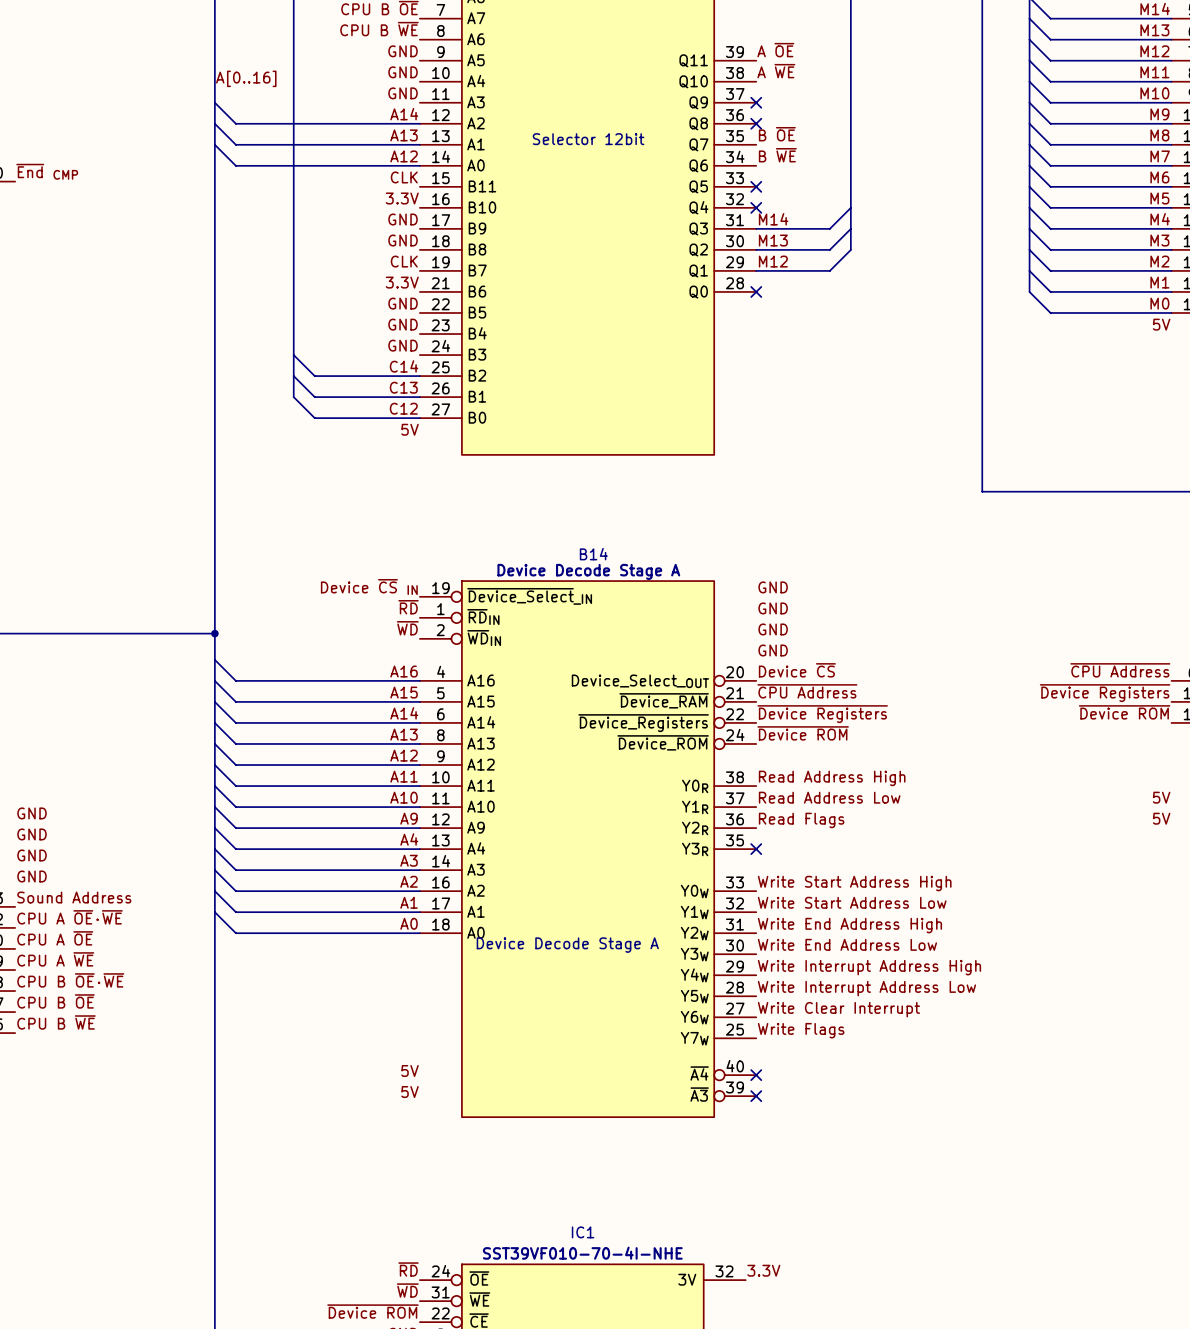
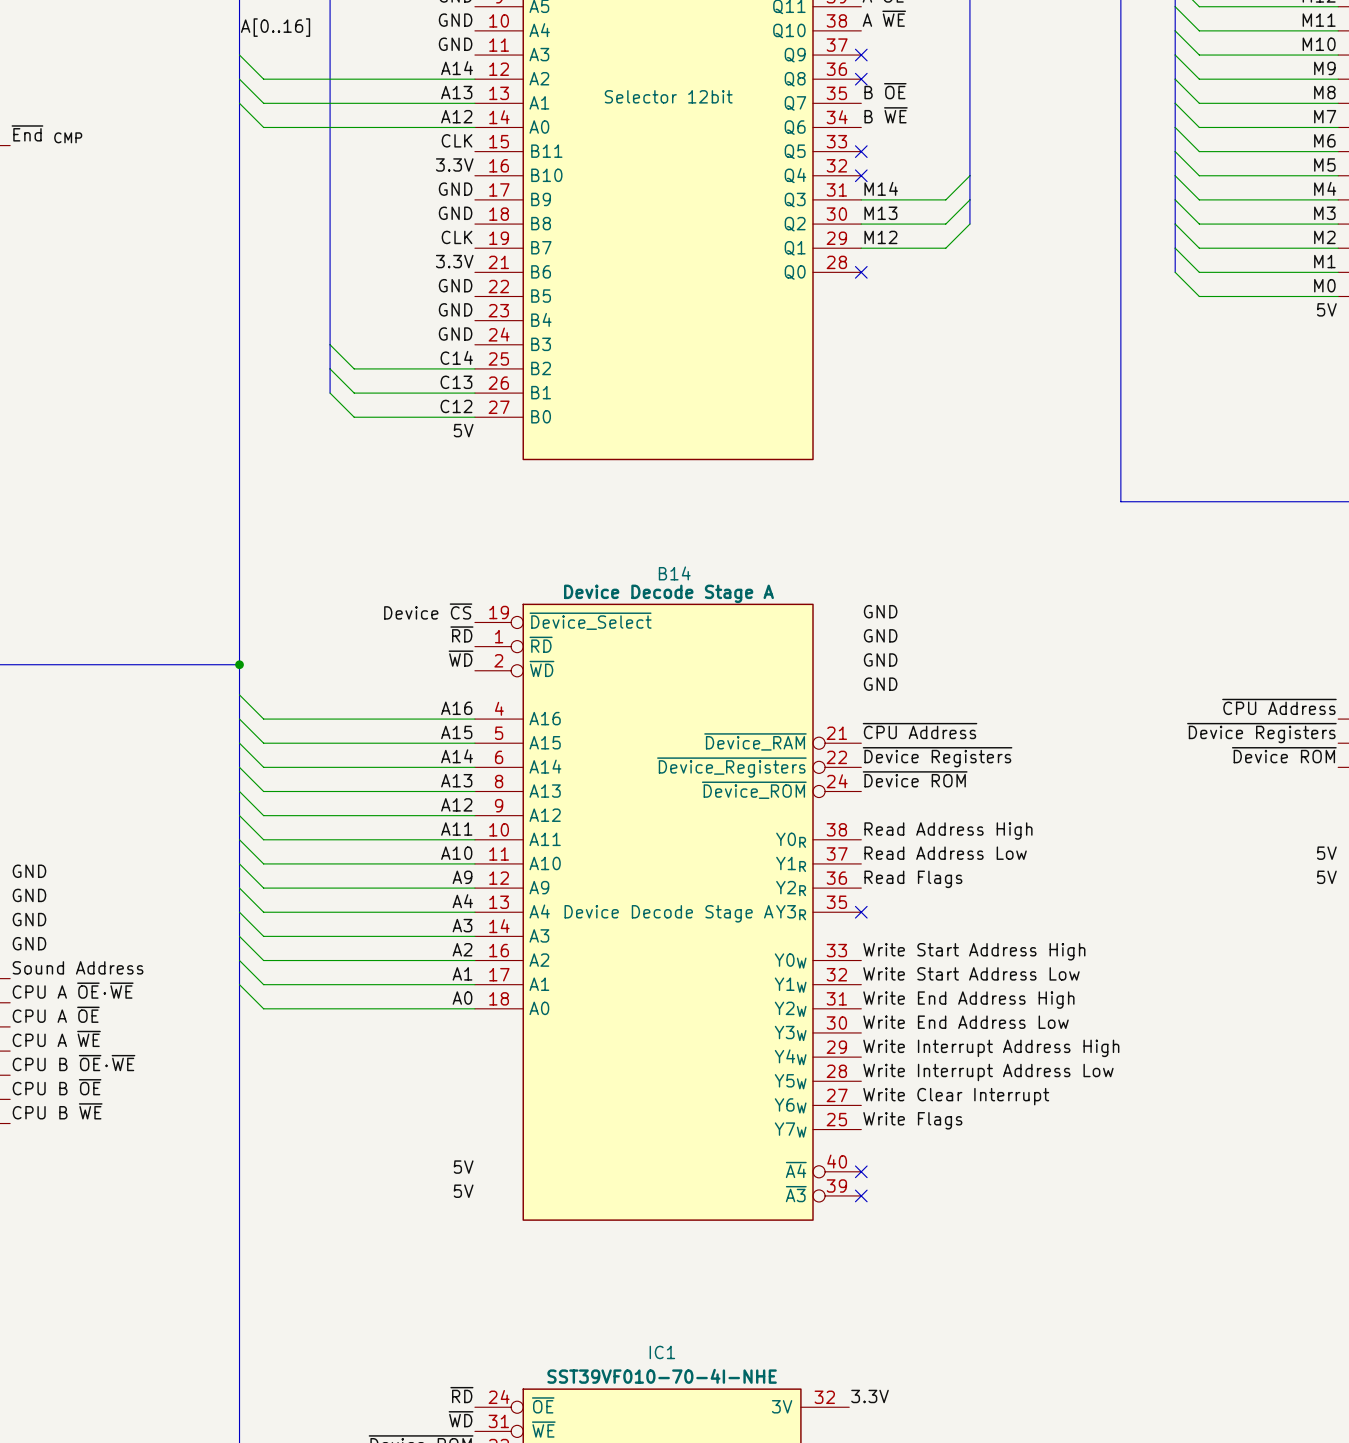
B14 symbol: [419, 580, 757, 1118] -> [474, 603, 862, 1221]
label: Device ~{CS} IN (369, 587) -> Device ~{CS} (428, 611)
label: Device ~{CS} (797, 670) -> none
B14 text position: Device Decode Stage A (567, 945) -> Device Decode Stage A (668, 913)

